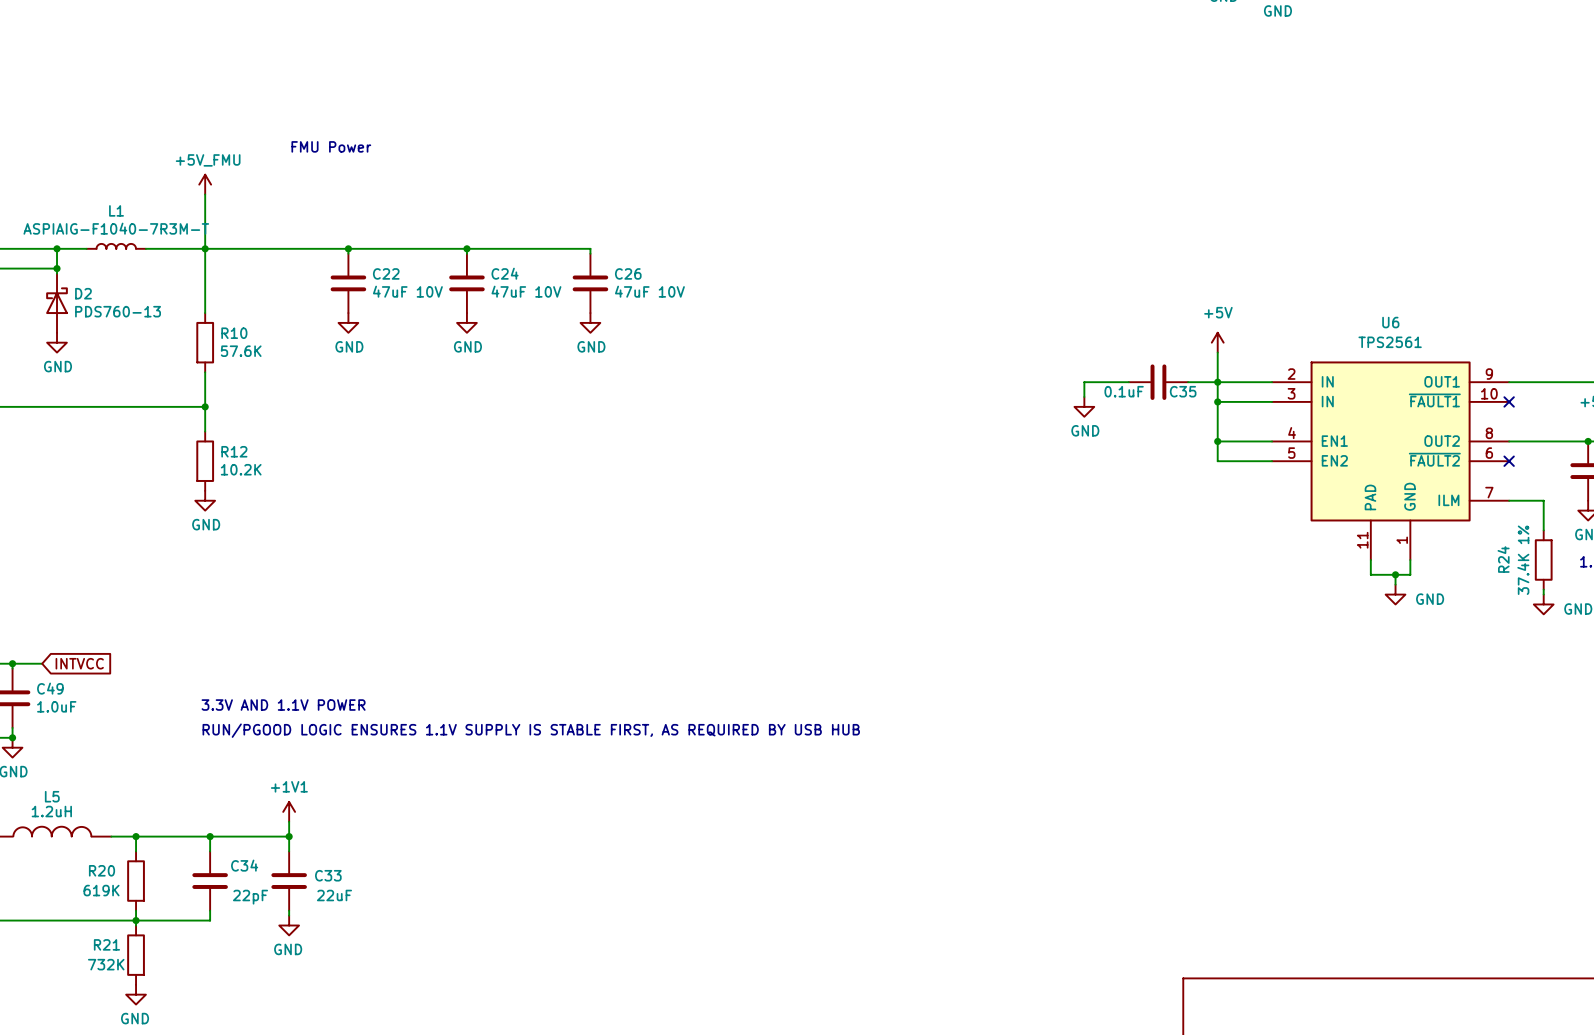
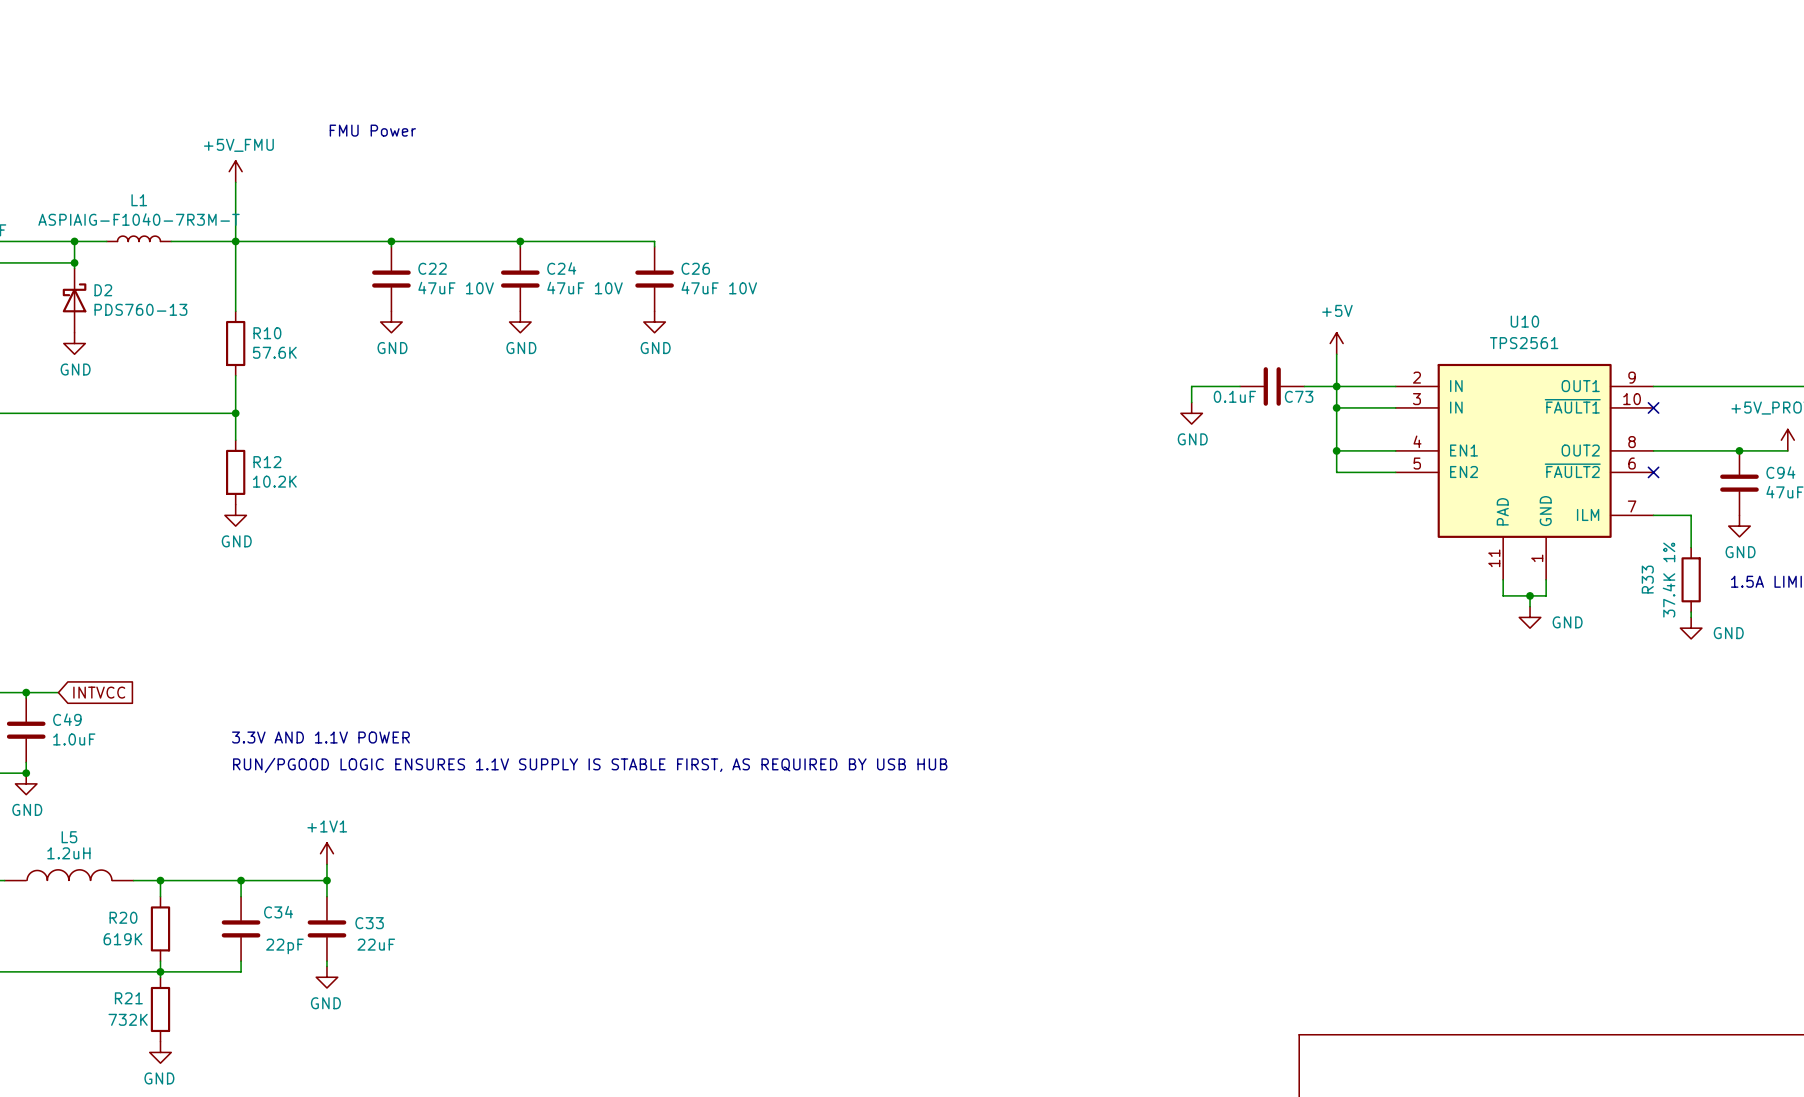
U6 name: U6 (1390, 322) -> U10 (1524, 321)
C35 name: C35 (1183, 391) -> C73 (1299, 396)
R24 name: R24 (1503, 559) -> R33 (1647, 579)

